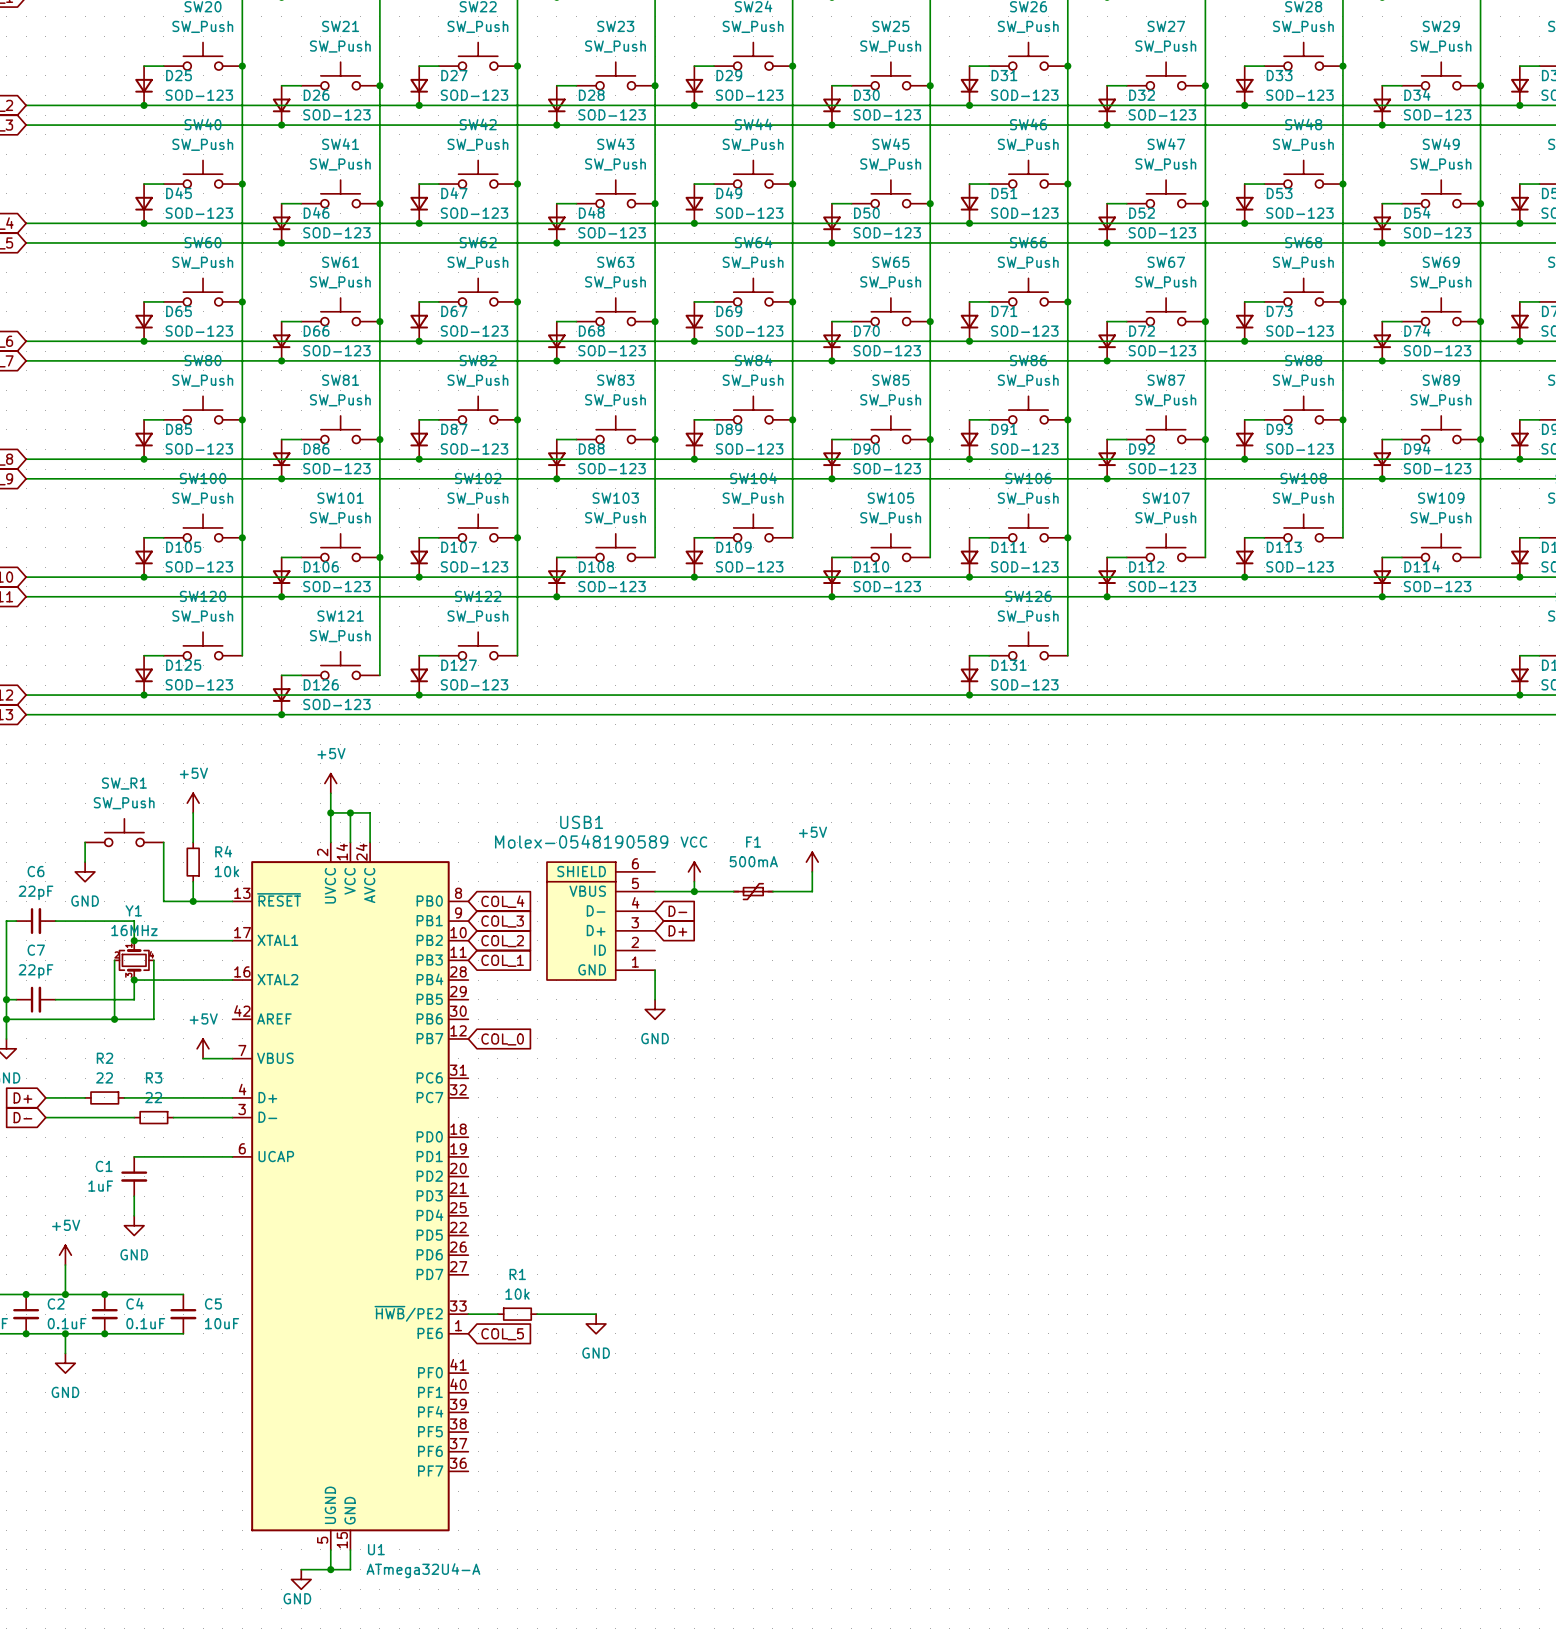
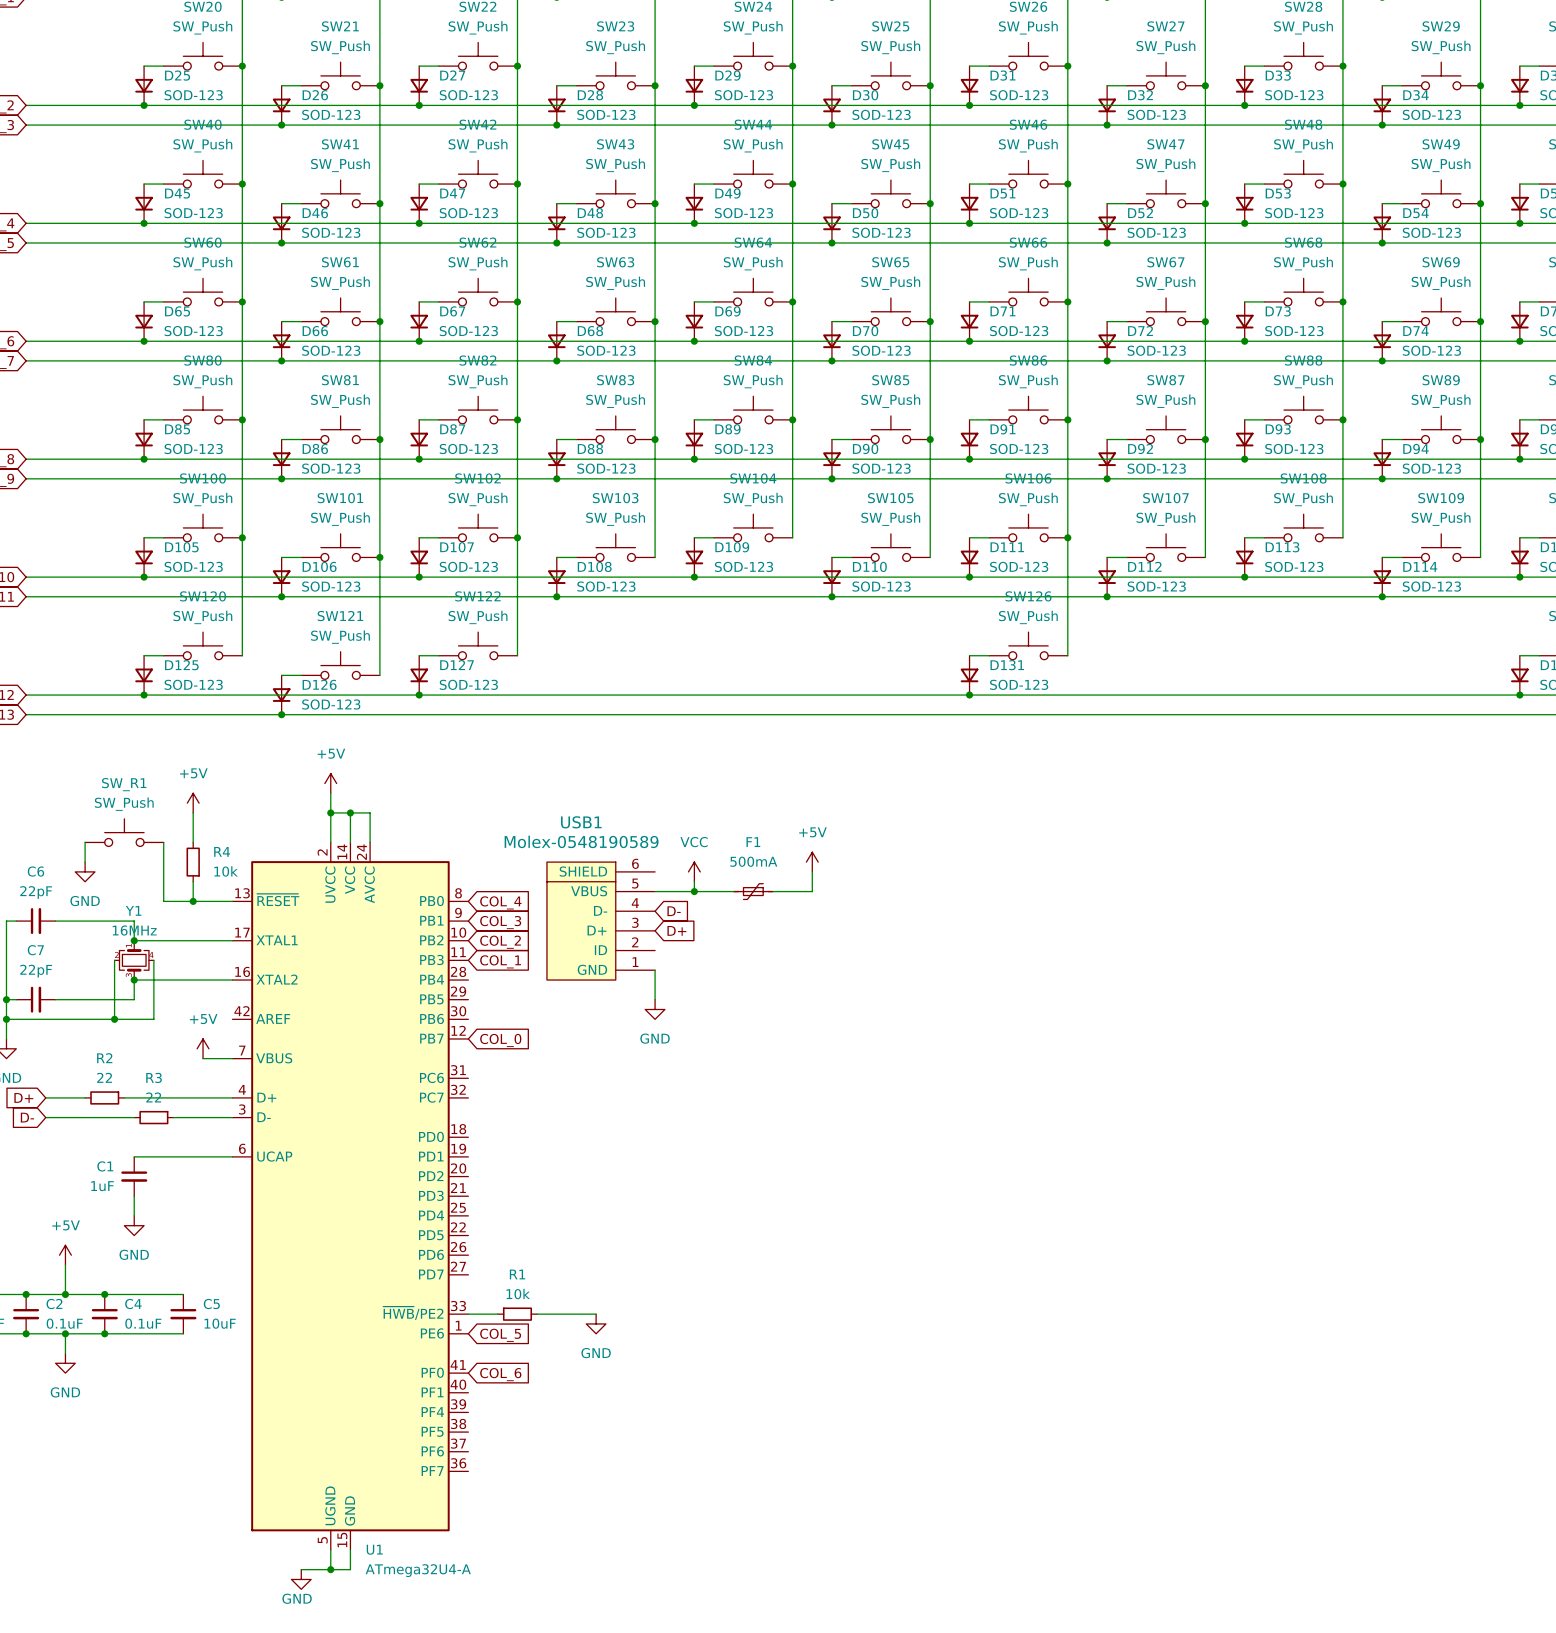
global label: none -> COL_6 (500, 1374)

